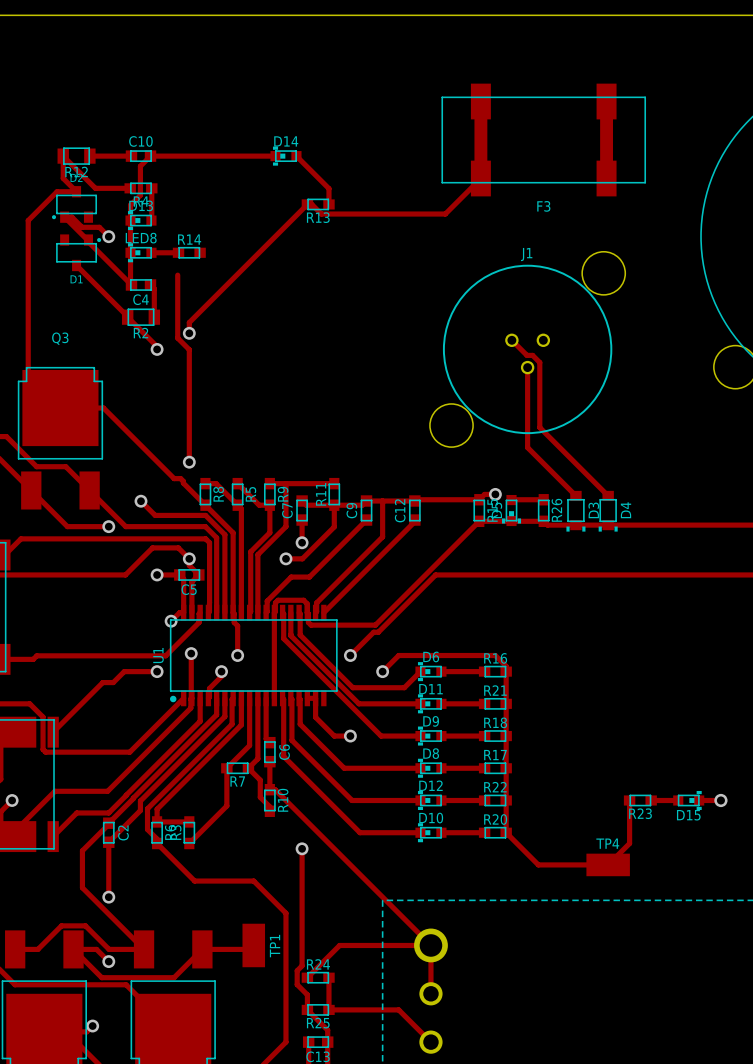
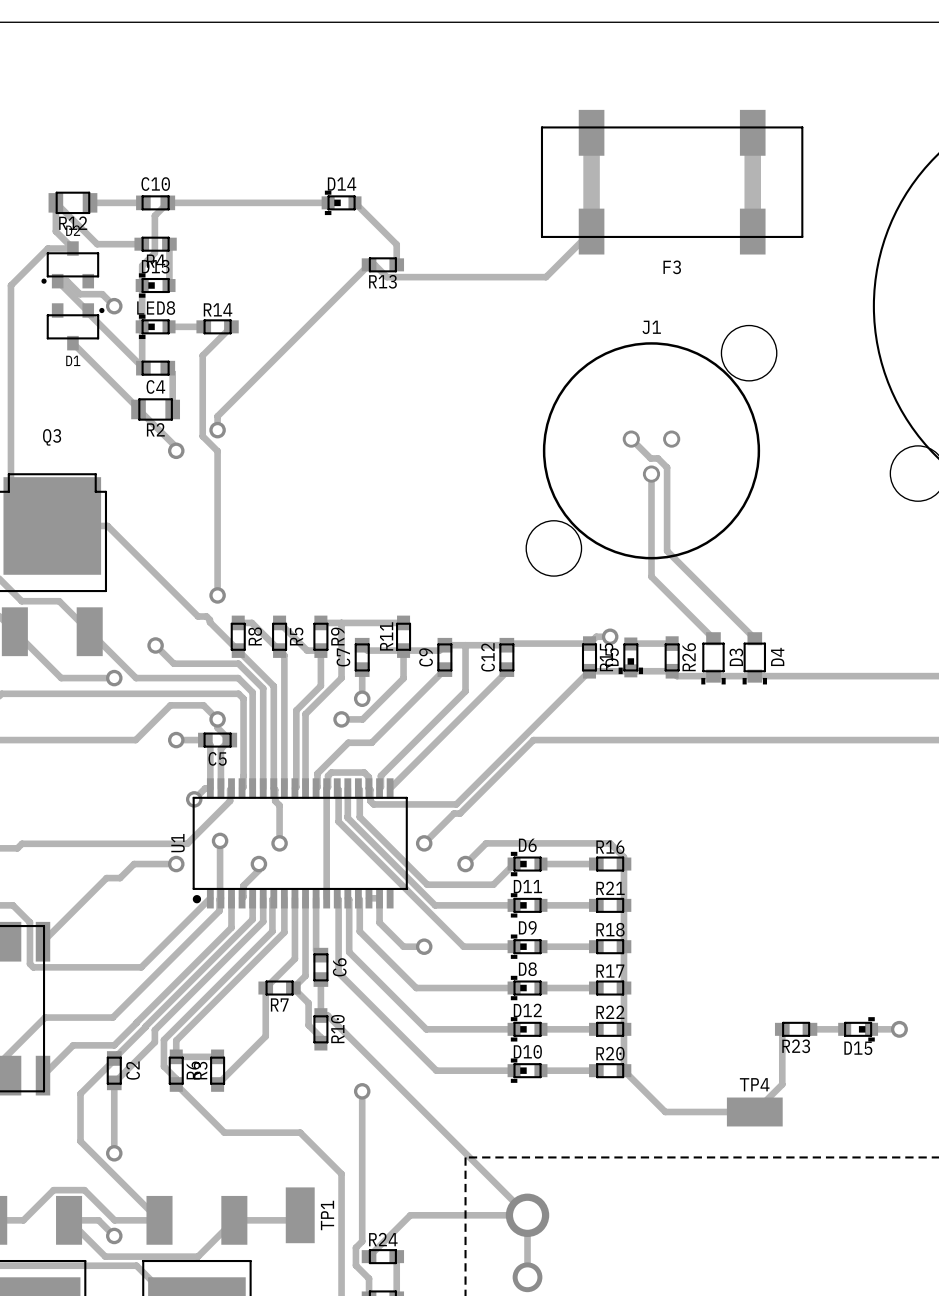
track: none -> (231, 326) (202, 355)

